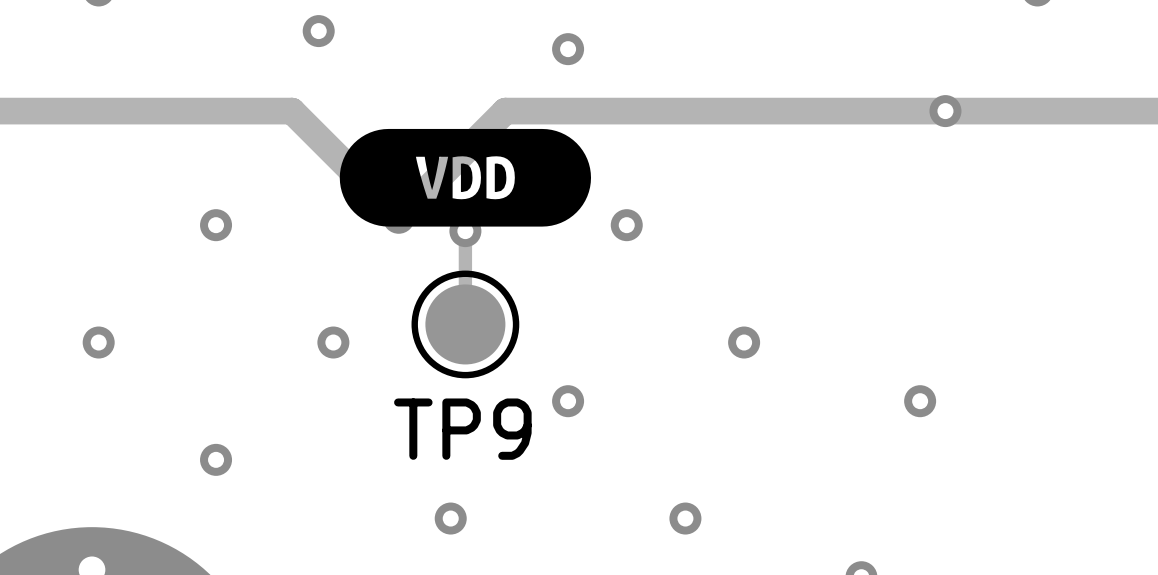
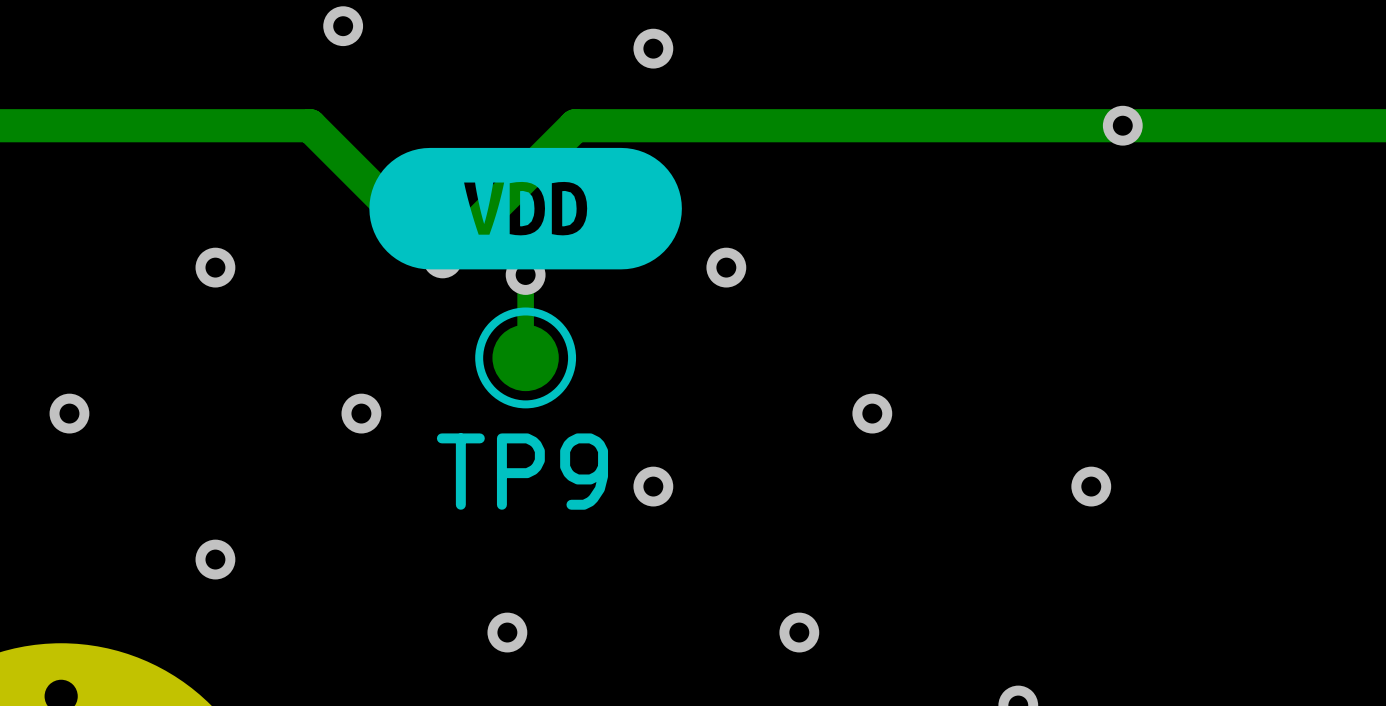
TP9 footprint: [411, 270, 520, 379] -> [475, 307, 577, 409]
TP9 name position: TP9 (462, 429) -> TP9 (522, 471)

